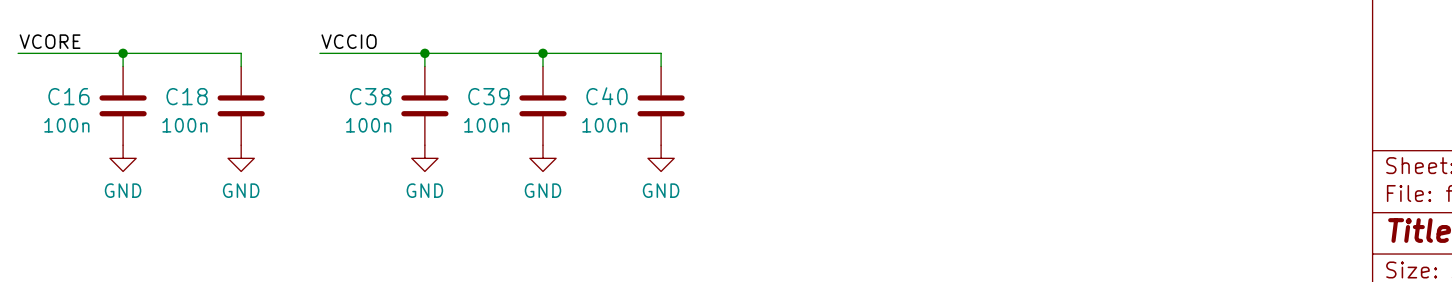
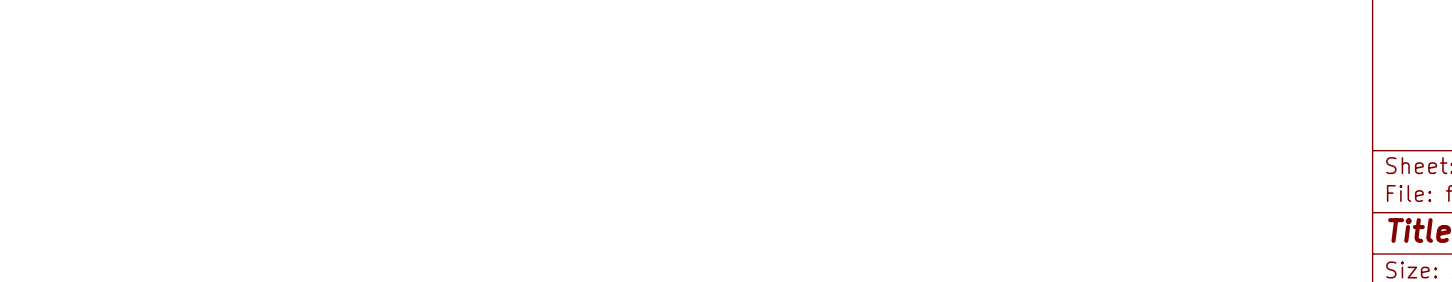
label: VCORE (50, 41) -> none
label: VCCIO (349, 41) -> none
wire: (18, 53) (241, 53) (241, 66) -> none
wire: (123, 53) (123, 66) -> none
junction: (123, 53) -> none
wire: (319, 53) (661, 53) (661, 66) -> none
wire: (424, 53) (424, 66) -> none
junction: (424, 53) -> none
wire: (542, 53) (542, 66) -> none
junction: (542, 53) -> none
C16: (123, 105) -> none
C18: (241, 105) -> none
C38: (424, 105) -> none
C39: (542, 105) -> none
C40: (661, 105) -> none
power symbol: GND (123, 158) -> none
power symbol: GND (241, 158) -> none
power symbol: GND (424, 158) -> none
power symbol: GND (542, 158) -> none
power symbol: GND (661, 158) -> none

